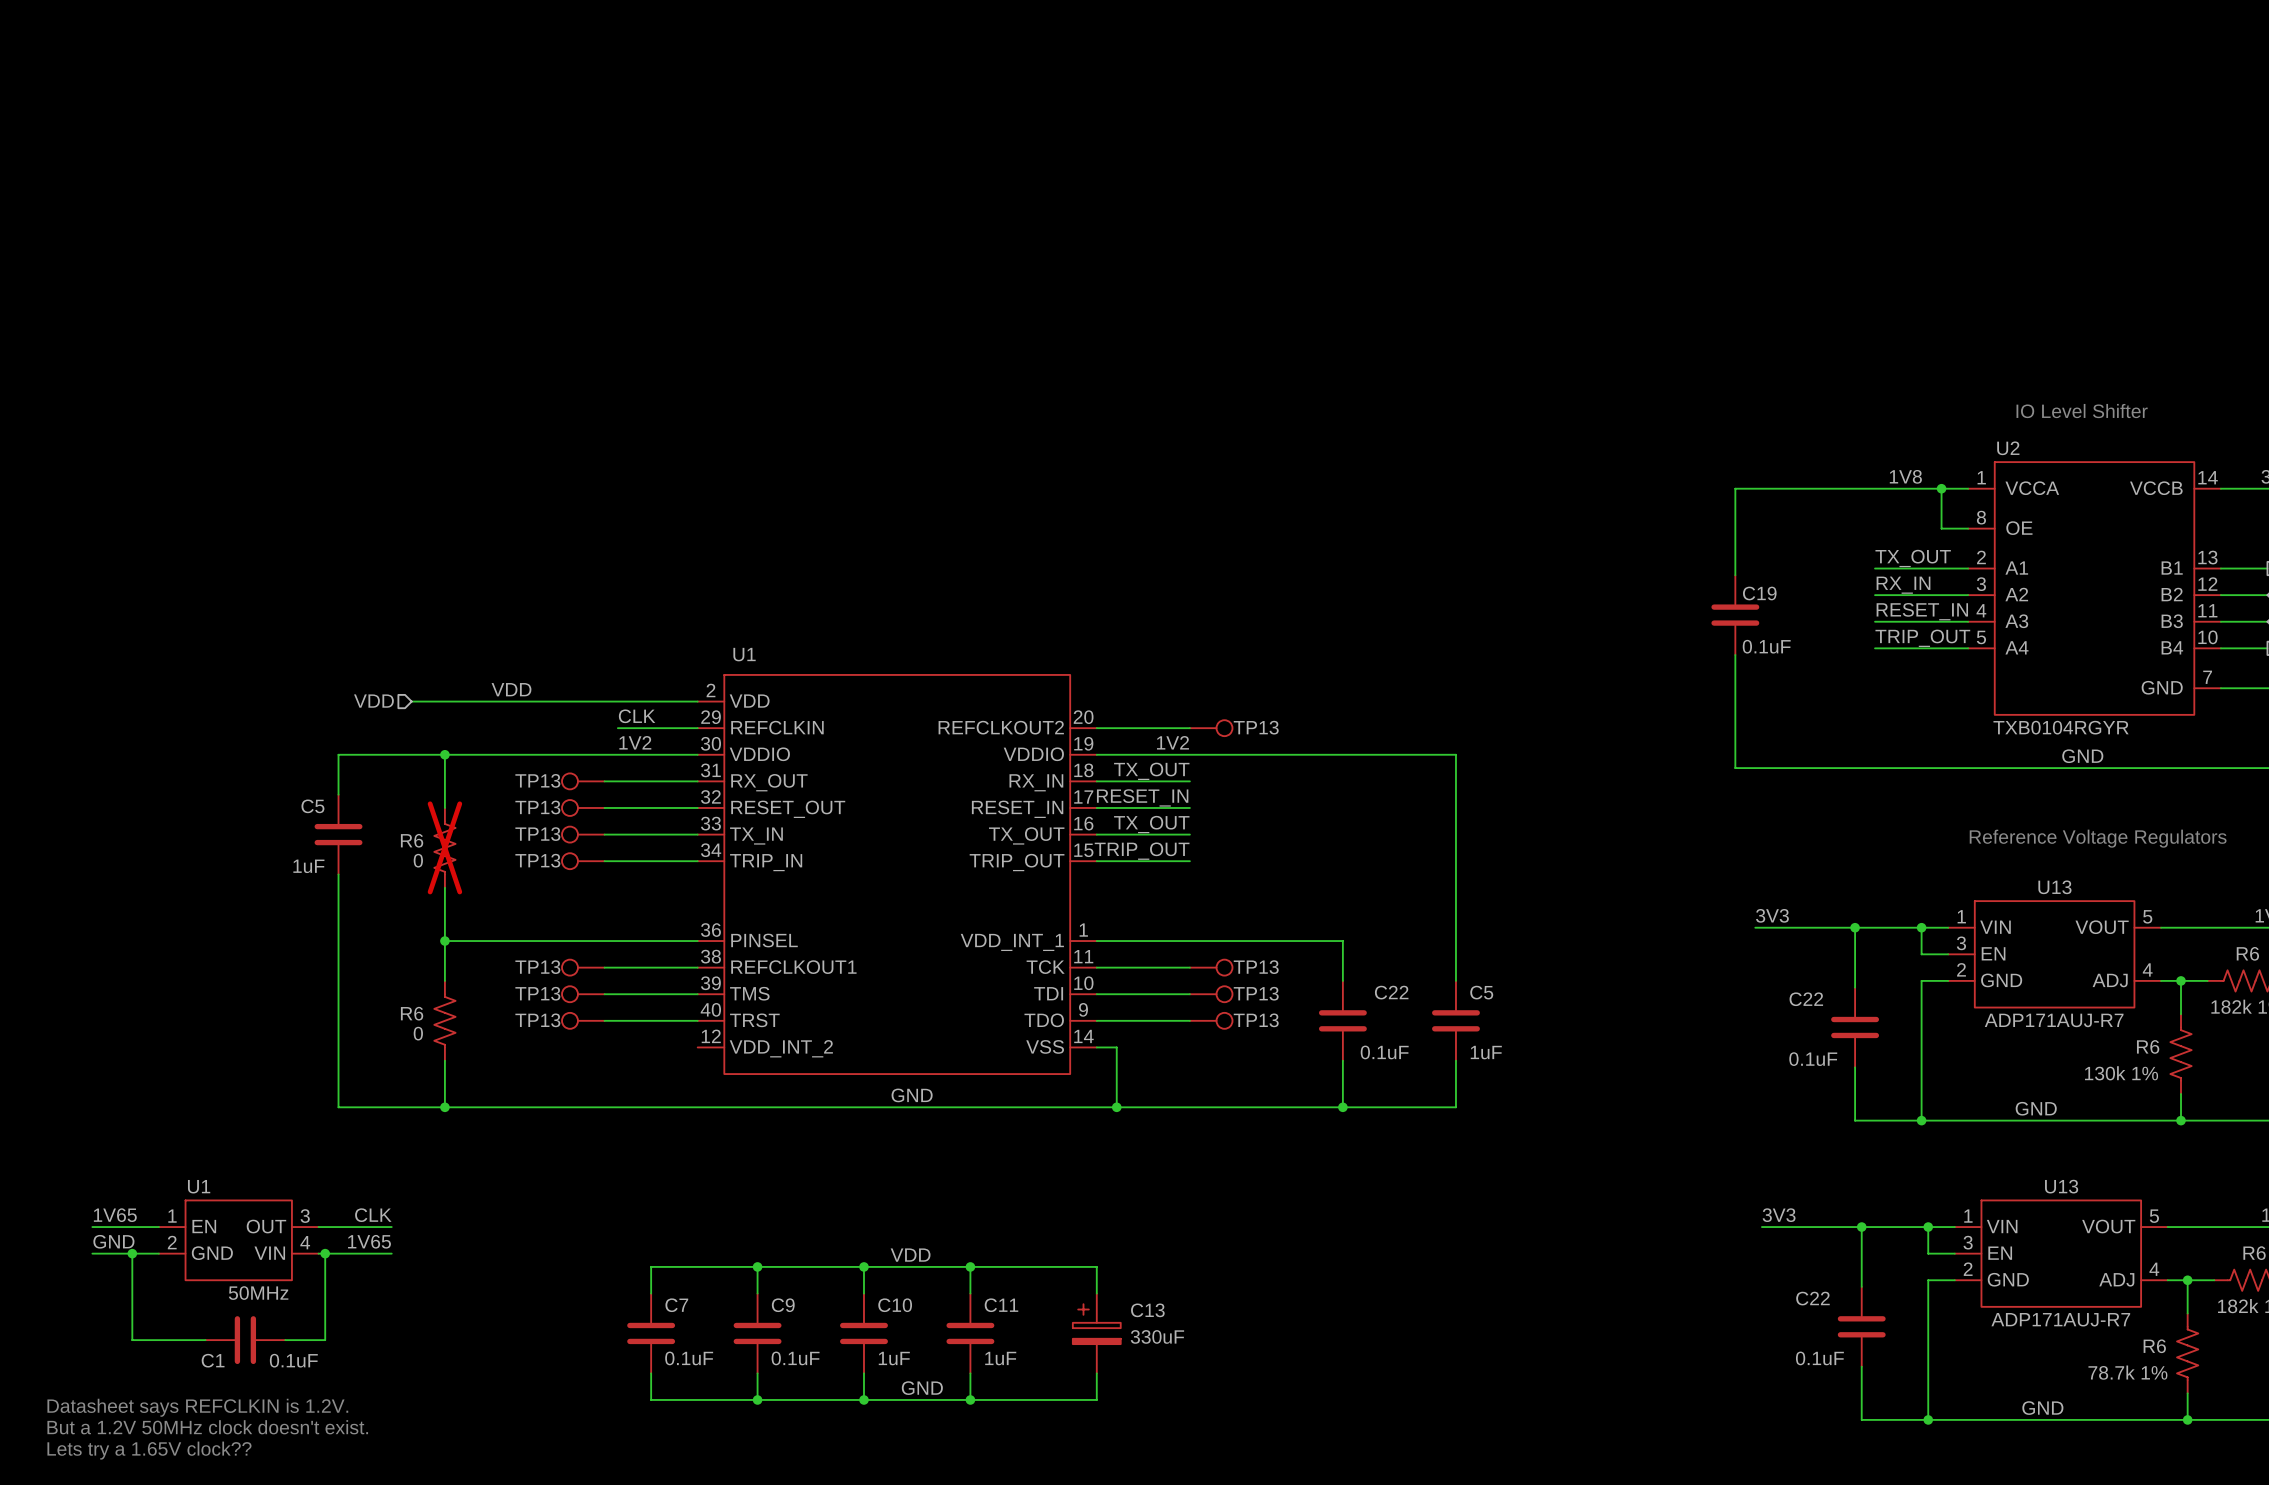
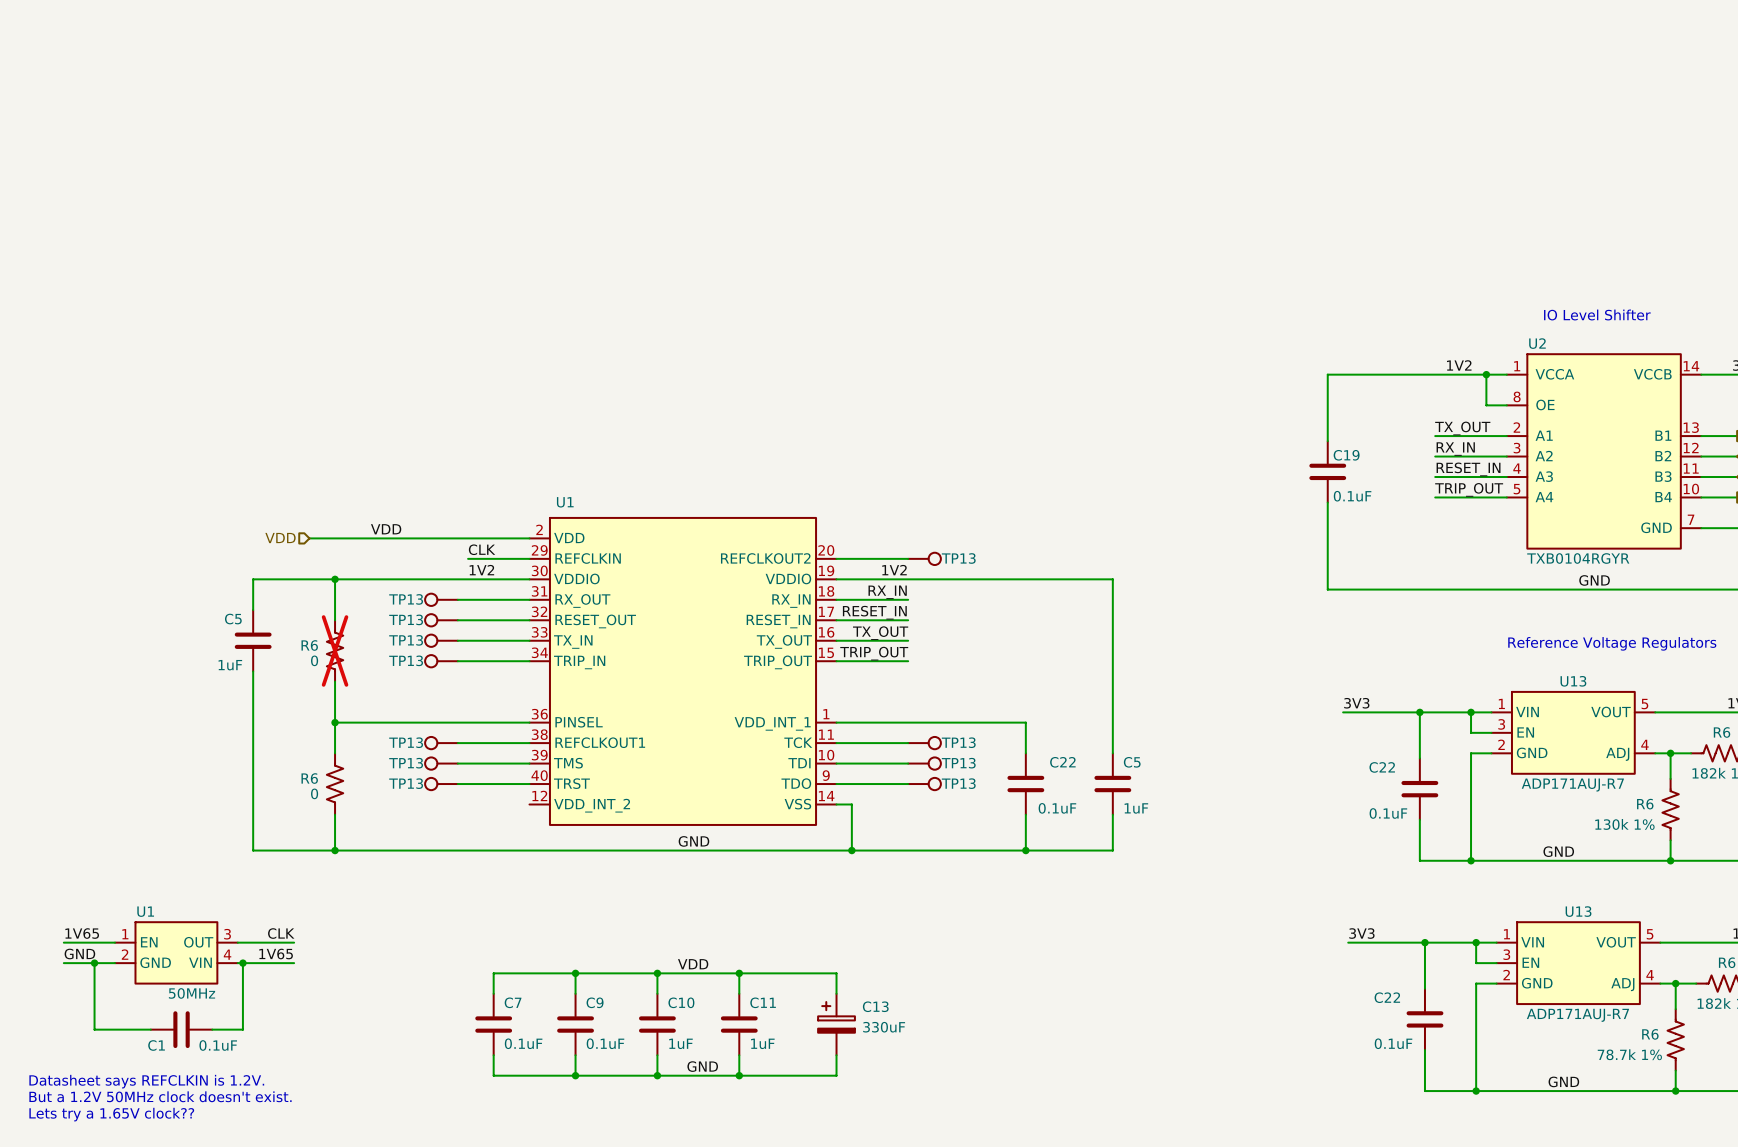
label: 1V8 (1905, 476) -> 1V2 (1459, 365)
label: TX_OUT (1151, 771) -> RX_IN (887, 592)

